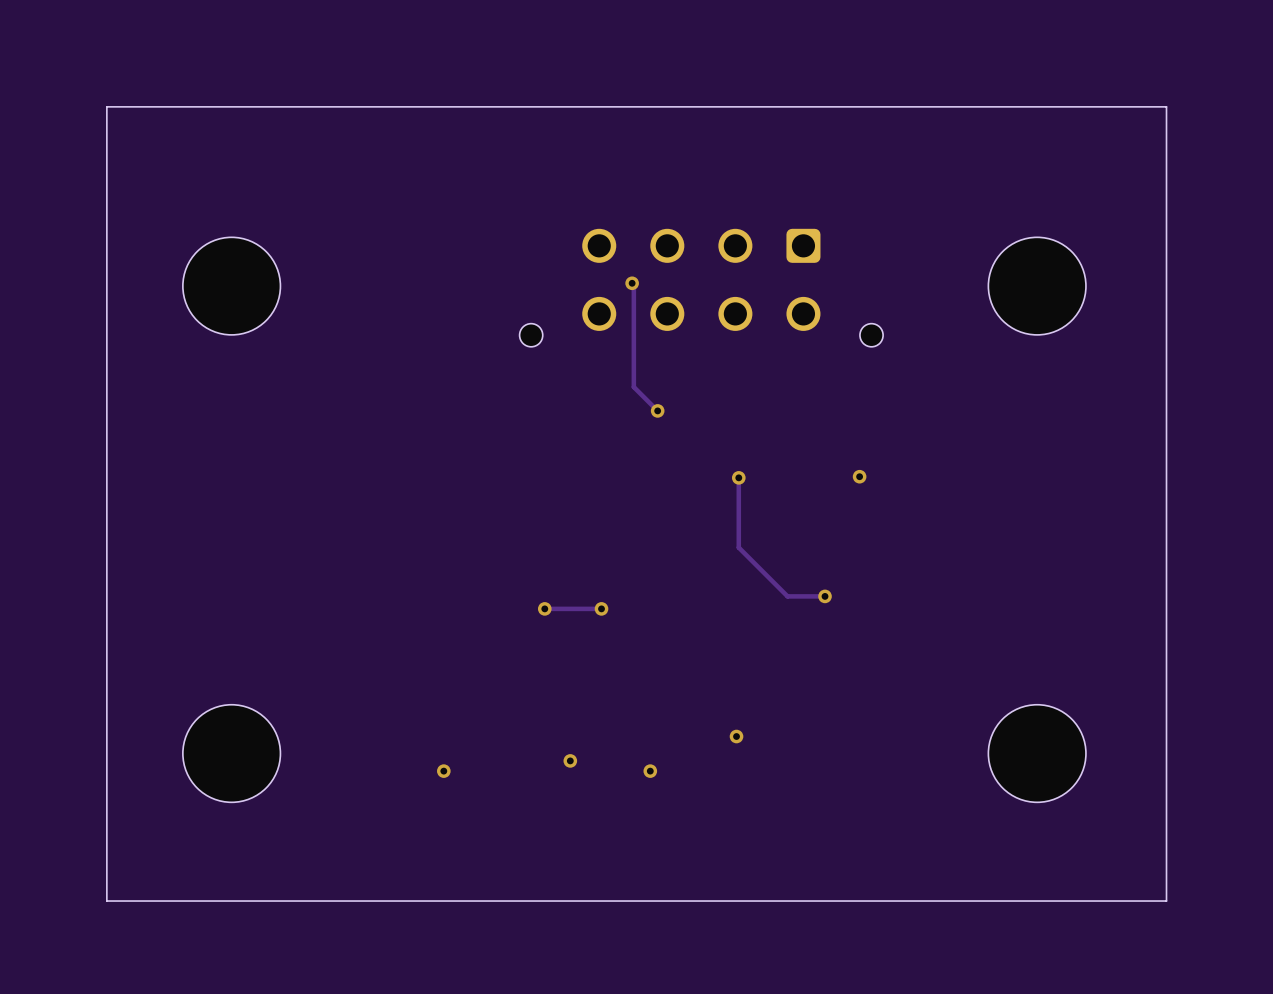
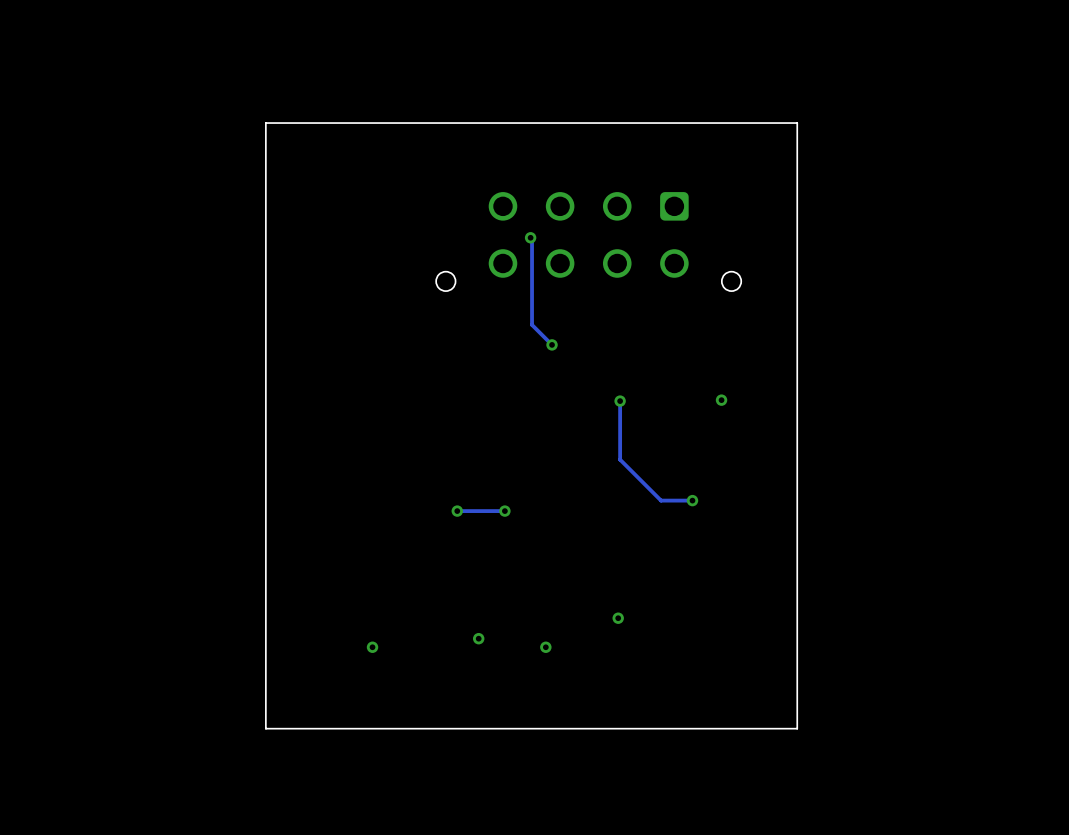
board edge: (1166, 106) (106, 106) (106, 901) (1166, 901) (1166, 106) -> (797, 123) (797, 728) (265, 728) (265, 123) (797, 123)
part: (231, 286) -> none
part: (1037, 286) -> none
part: (231, 753) -> none
part: (1037, 753) -> none

